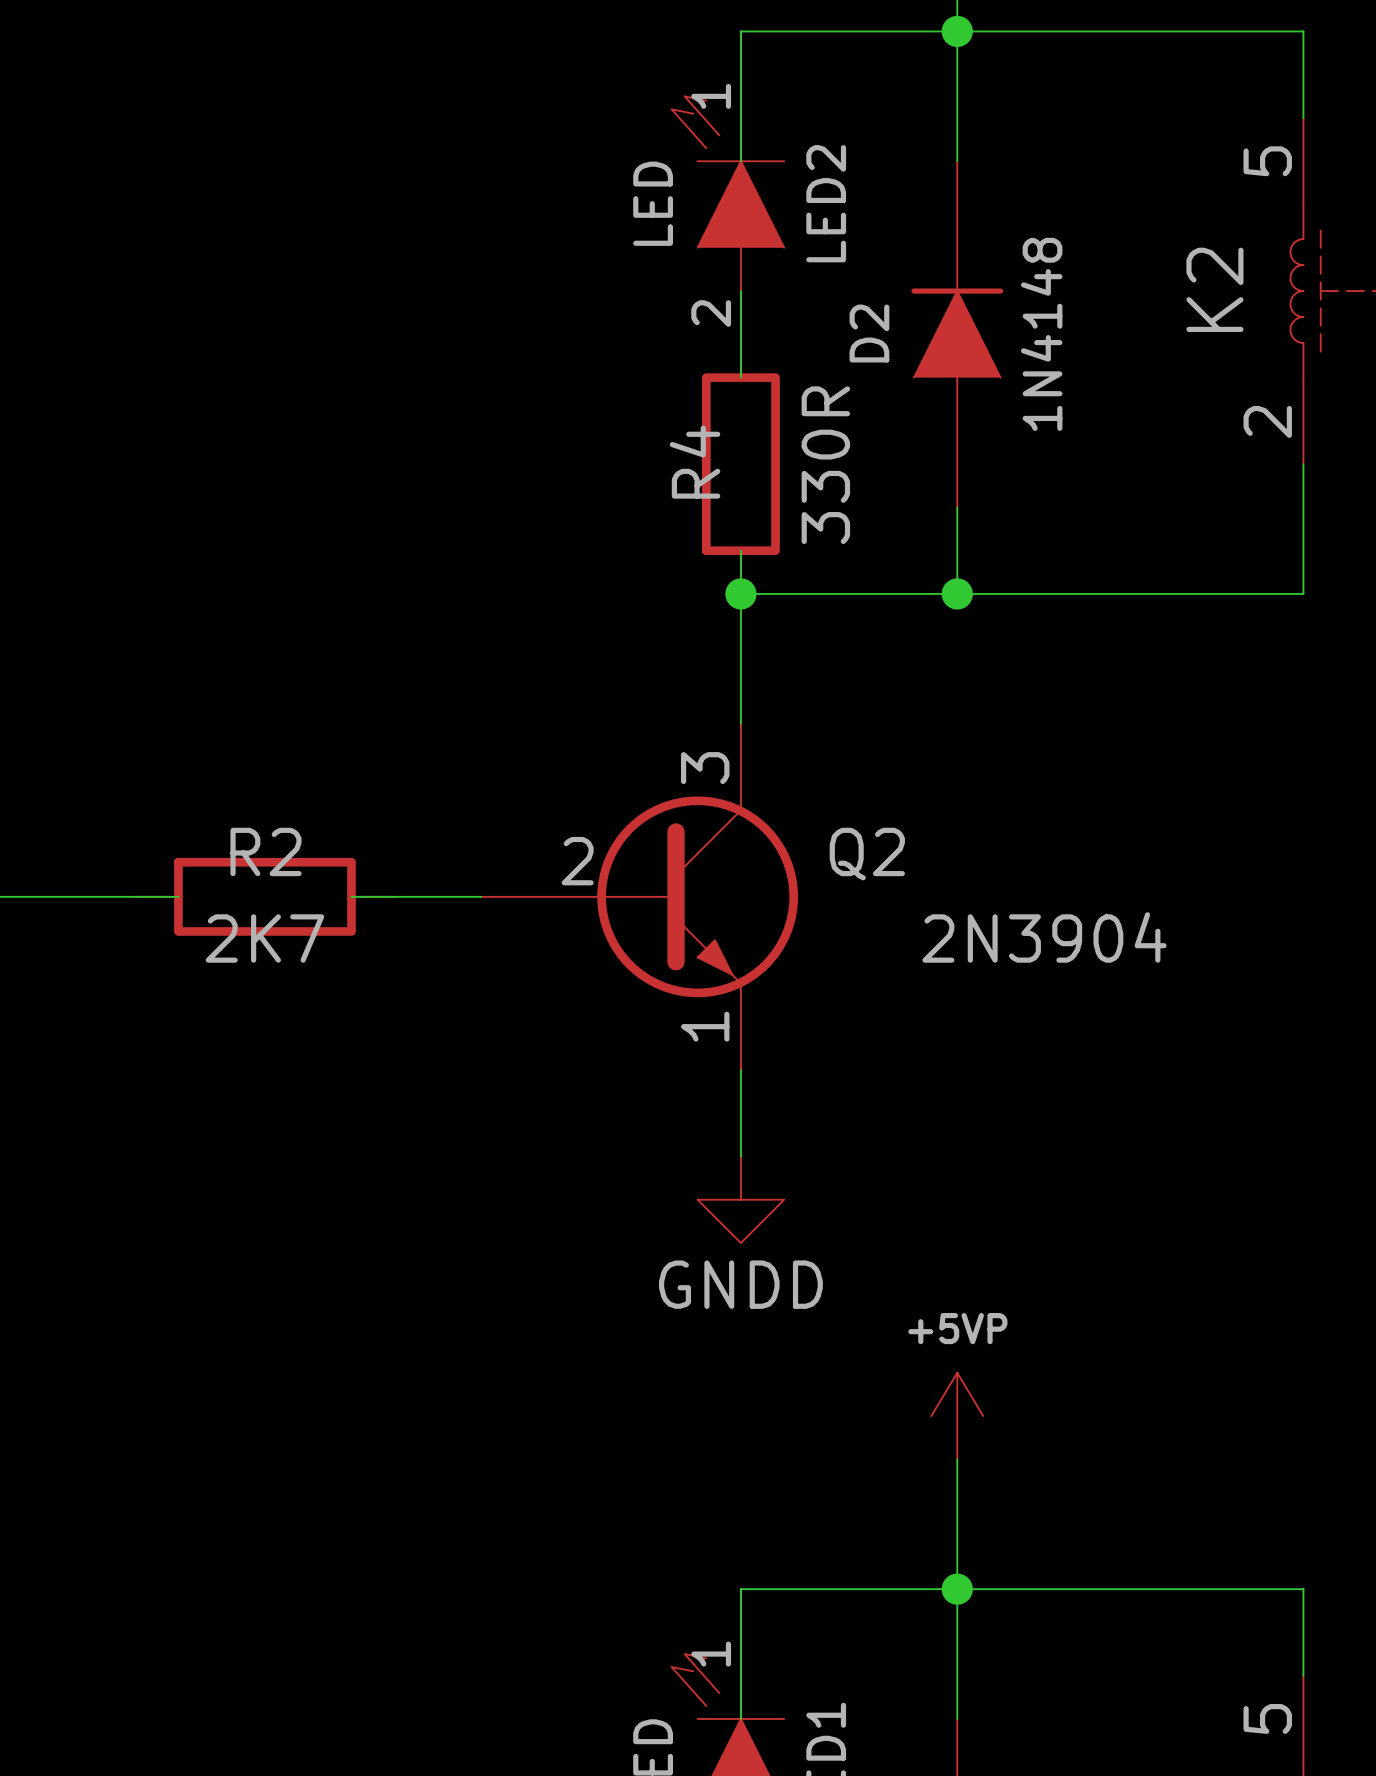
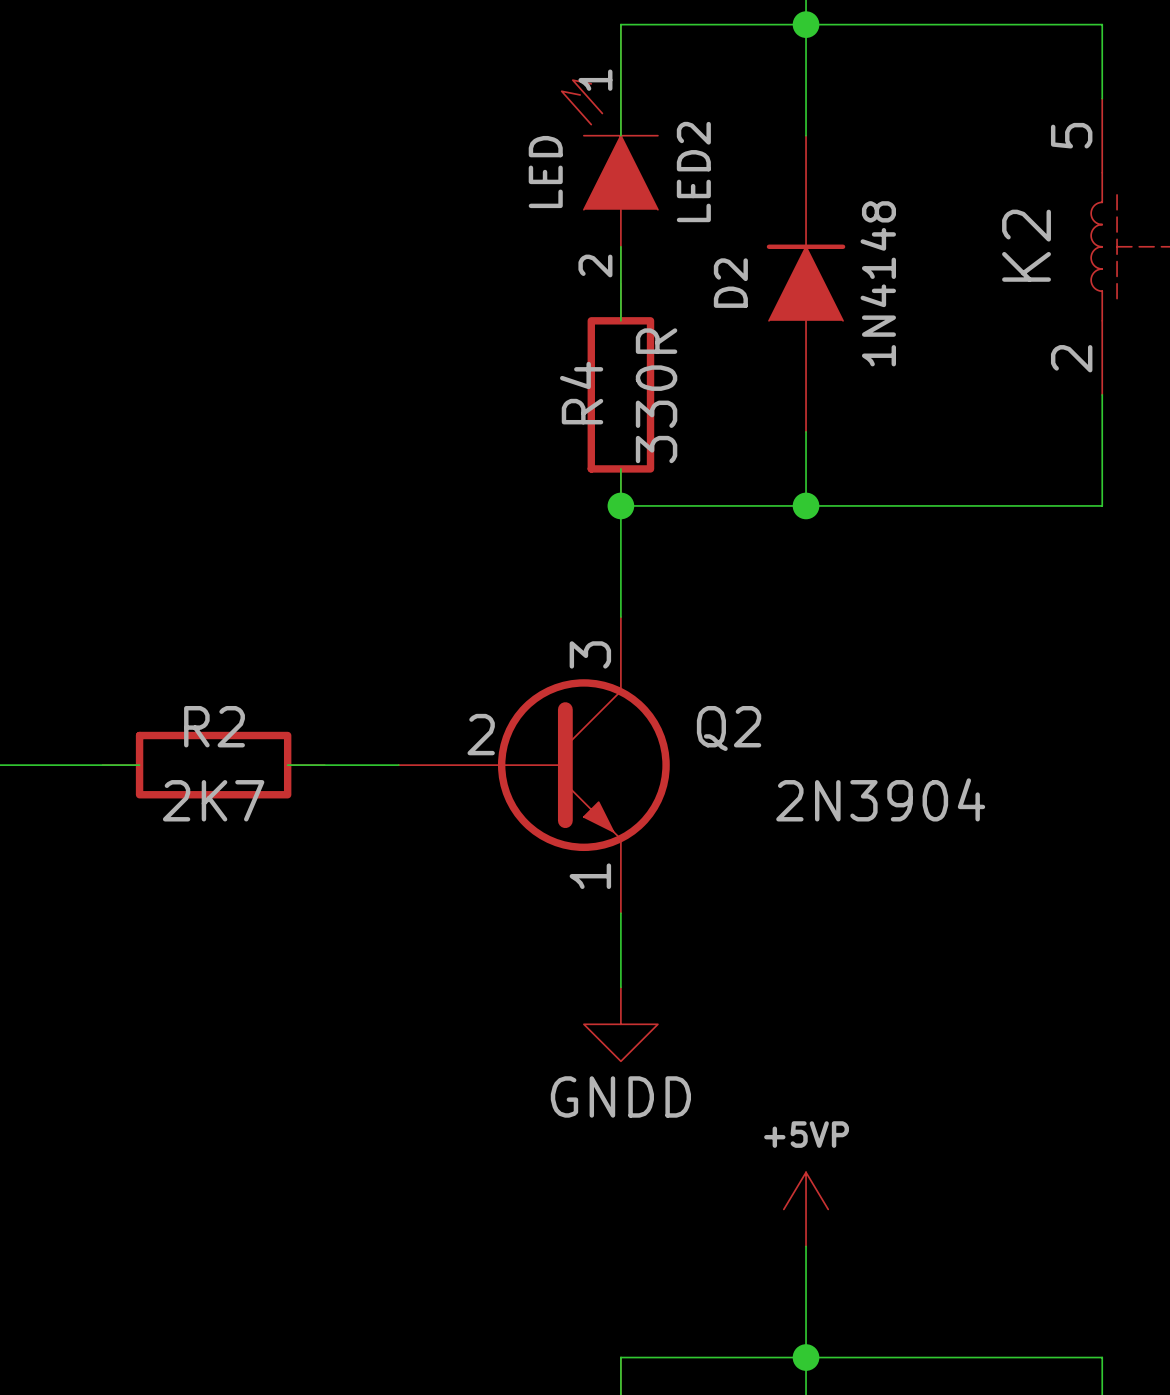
R4 value position: 330R (825, 465) -> 330R (656, 395)

